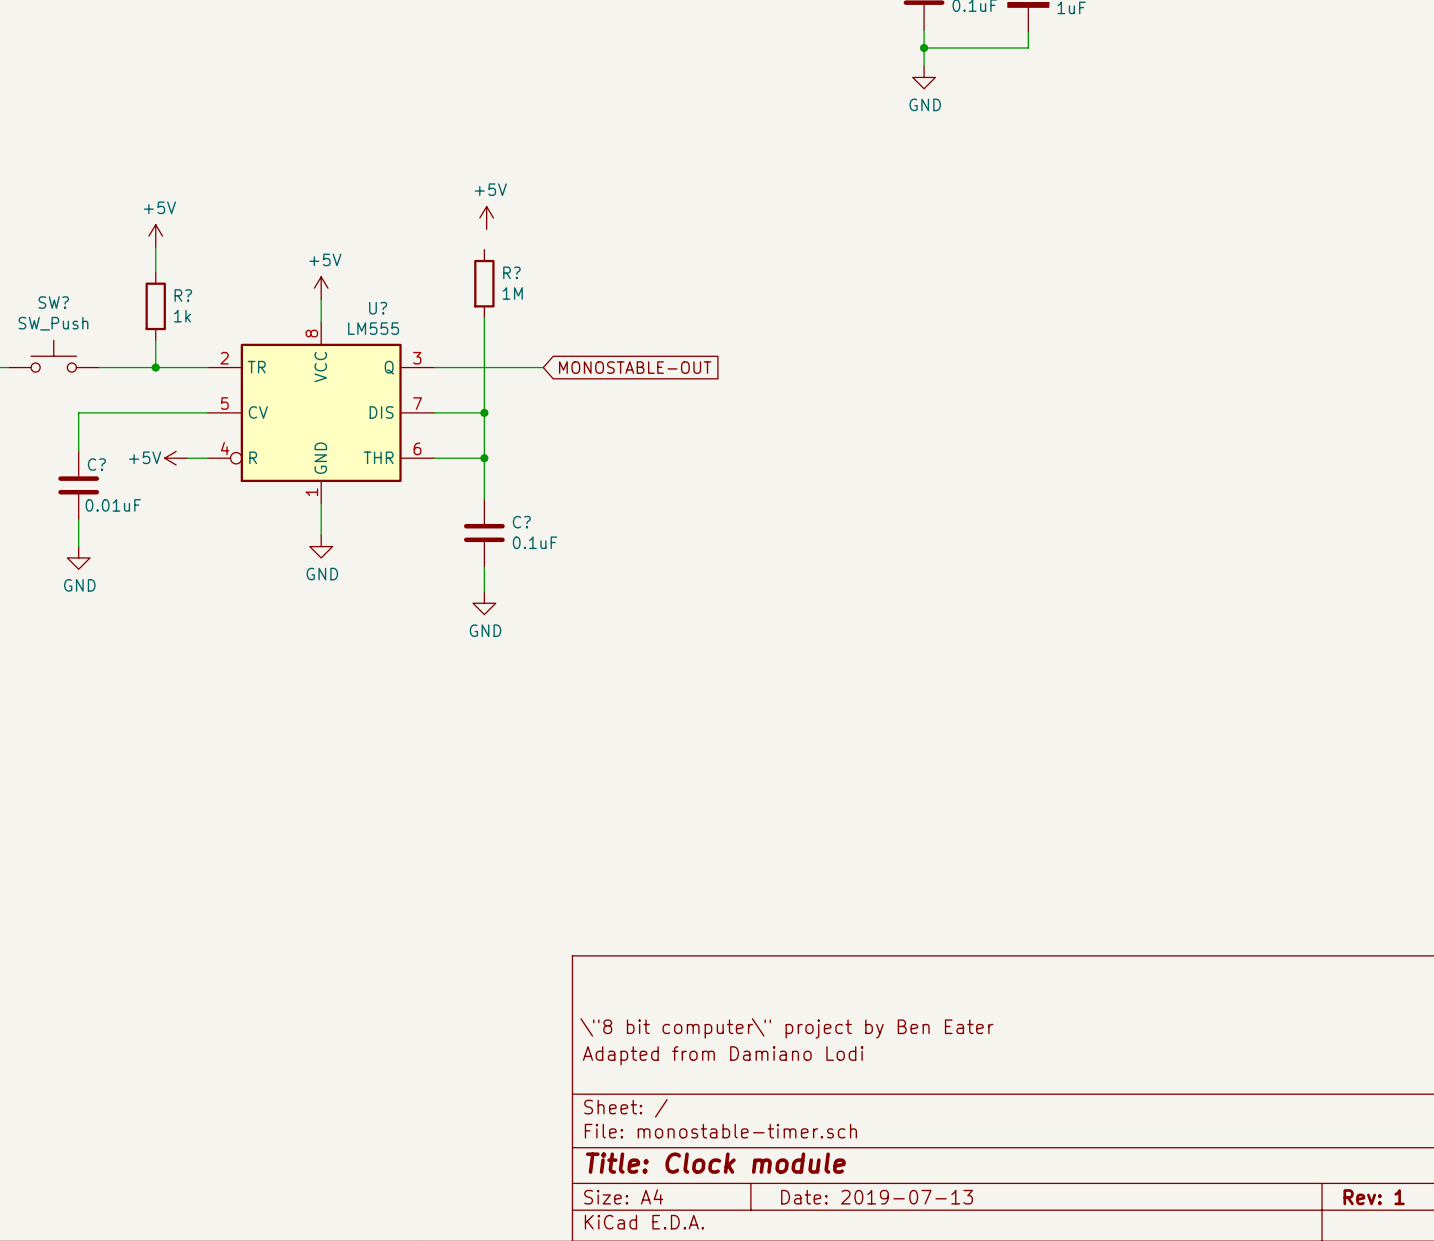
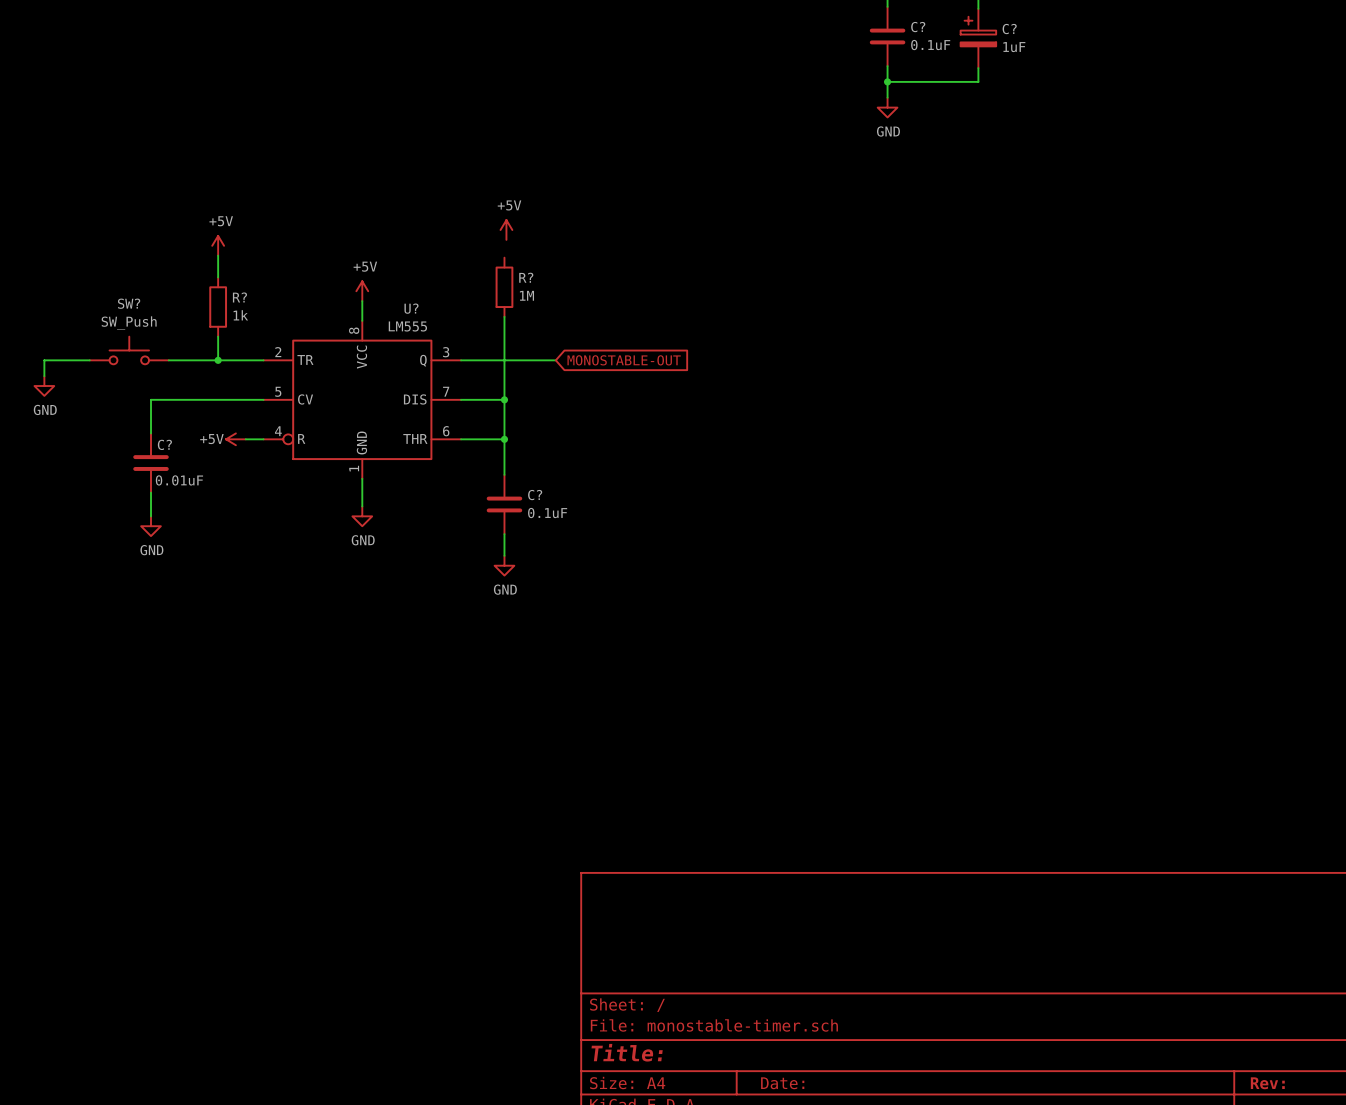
title block: \"8 bit computer\" project by Ben Eater (786, 1028) -> none
title block: Adapted from Damiano Lodi (723, 1055) -> none
title block: Title: Clock module (715, 1163) -> Title: (627, 1052)
title block: Date: 2019-07-13 (877, 1197) -> Date: (782, 1083)
title block: Rev: 1 (1374, 1197) -> Rev: (1267, 1083)

